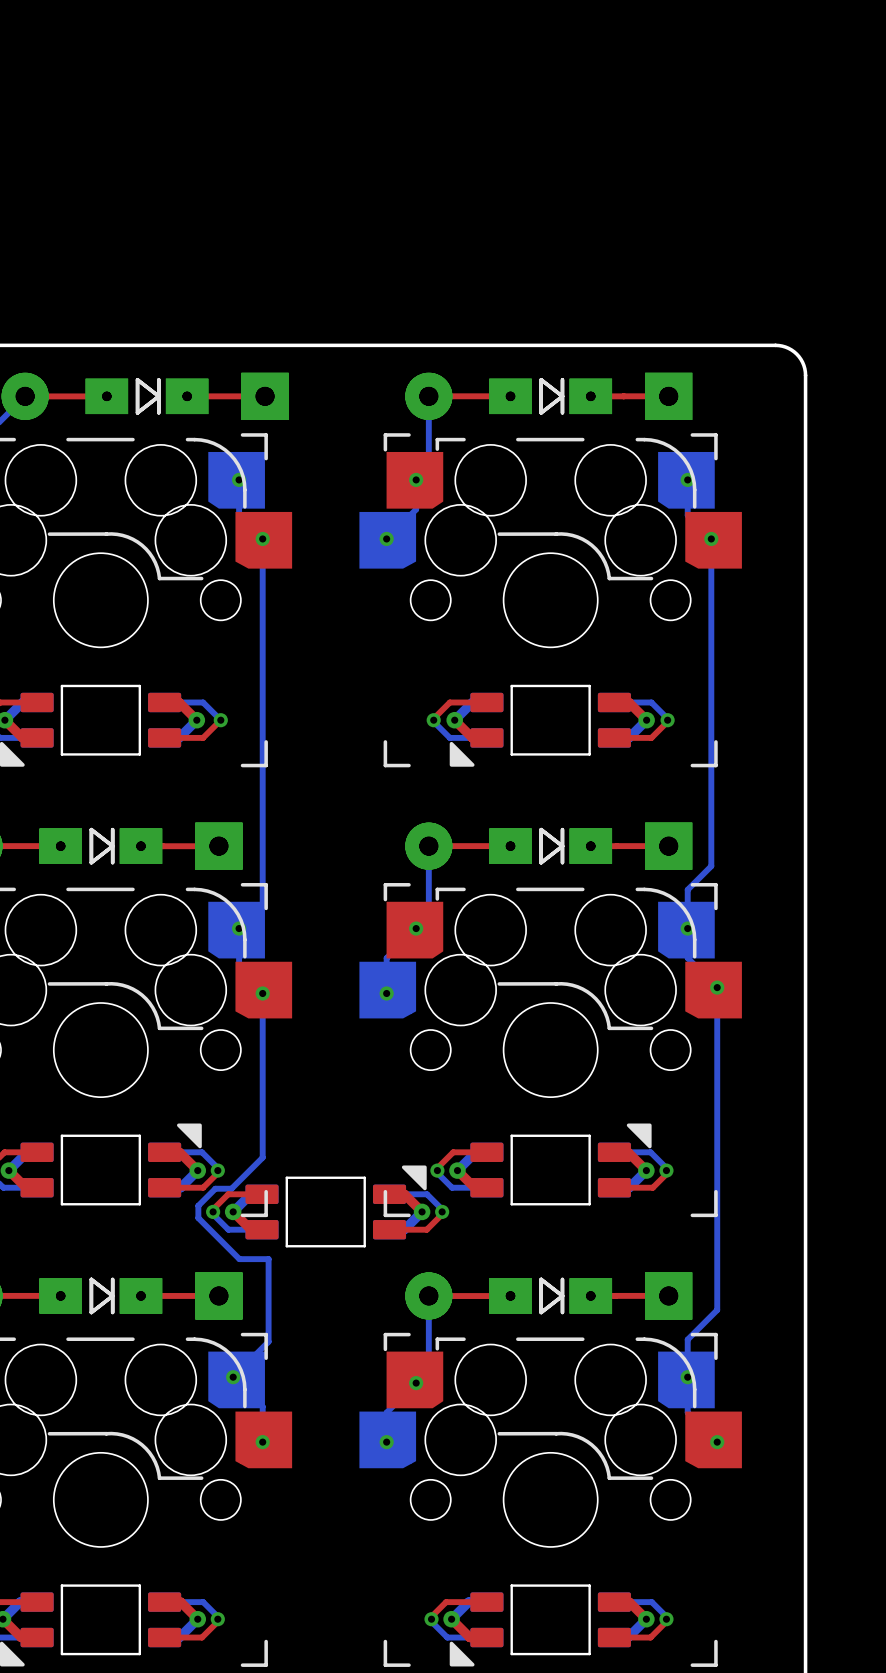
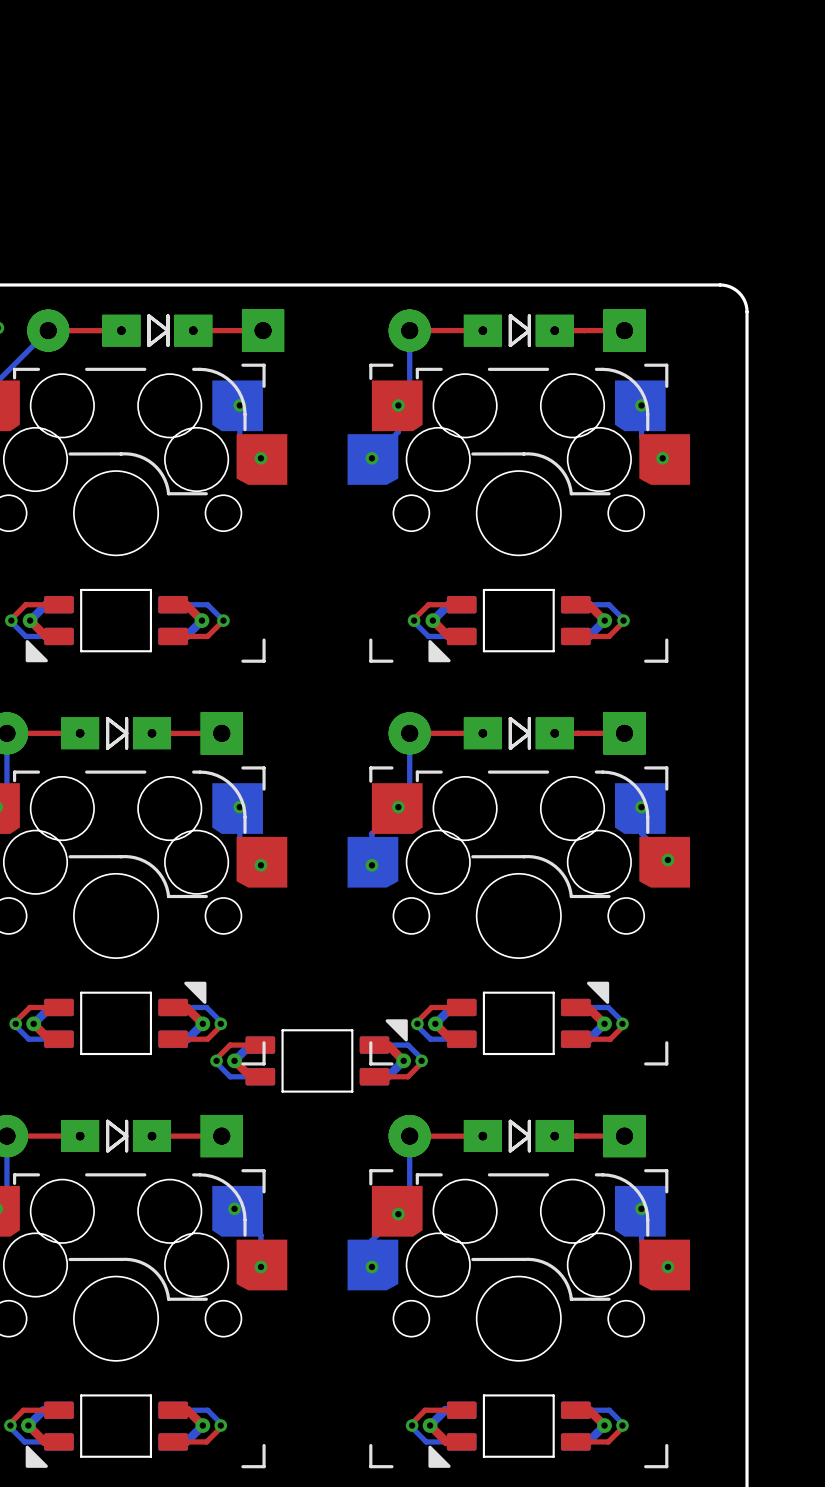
bottom track: (262, 538) (262, 904) (239, 928) -> none
bottom track: (711, 538) (711, 866) (687, 889) (687, 928) -> none
bottom track: (717, 987) (717, 1310) (687, 1339) (687, 1377) -> none
bottom track: (262, 993) (262, 1157) (231, 1188) (215, 1188) (198, 1205) (198, 1218) (239, 1259) (268, 1259) (268, 1341) (233, 1377) -> none

